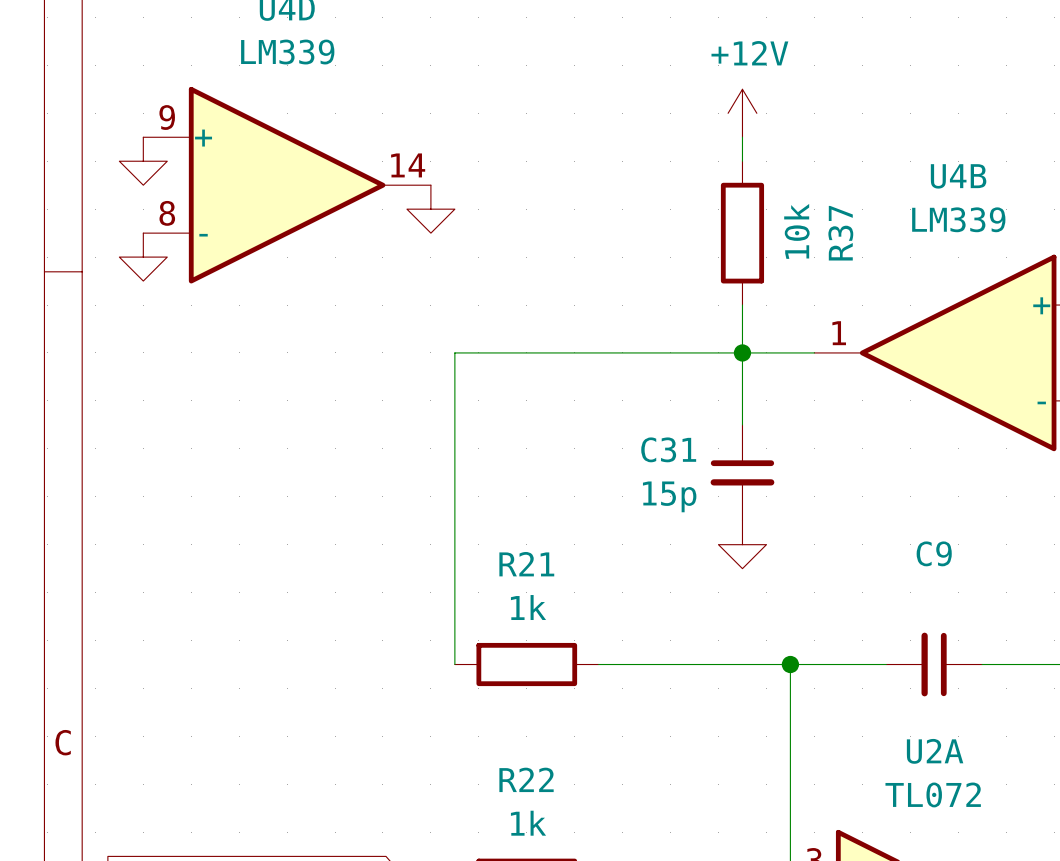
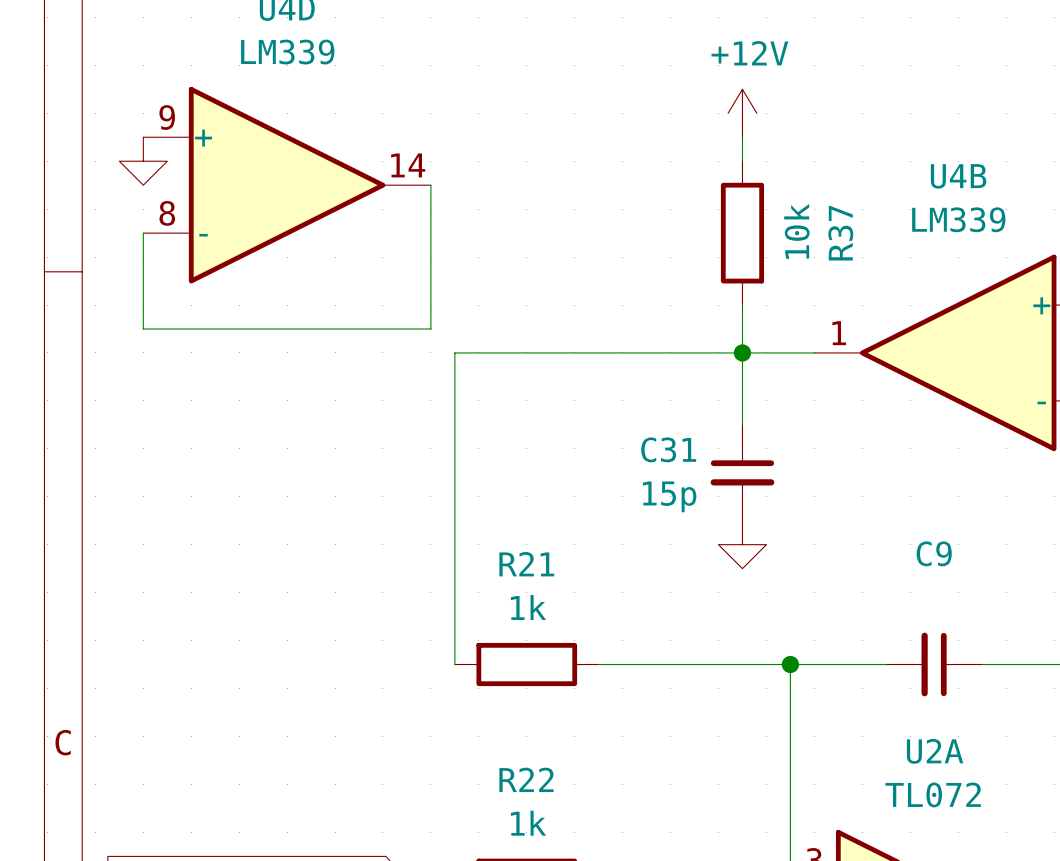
wire: none -> (430, 185) (430, 328) (143, 328) (143, 233)
power symbol: (430, 209) -> none
power symbol: (143, 257) -> none

